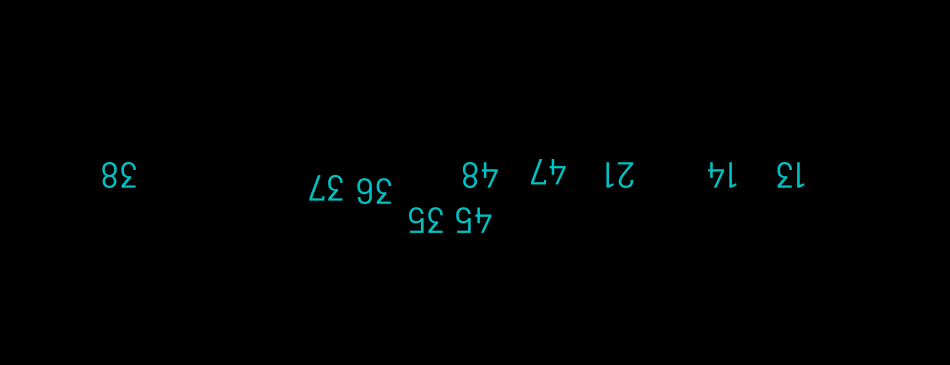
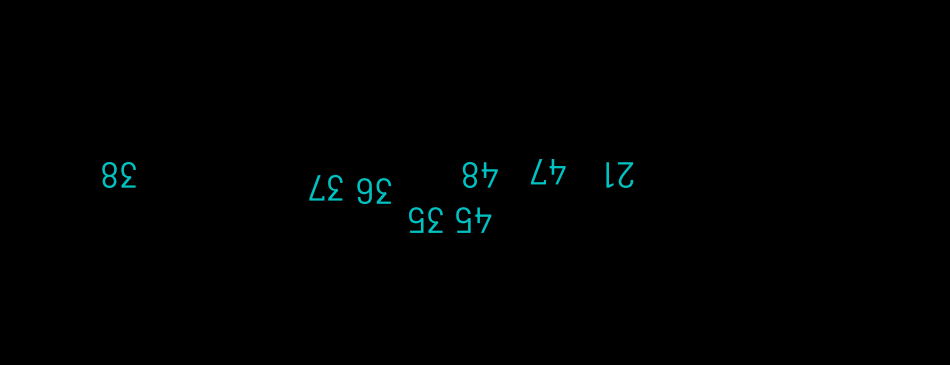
text: 14 (722, 174) -> none
text: 13 (790, 174) -> none

